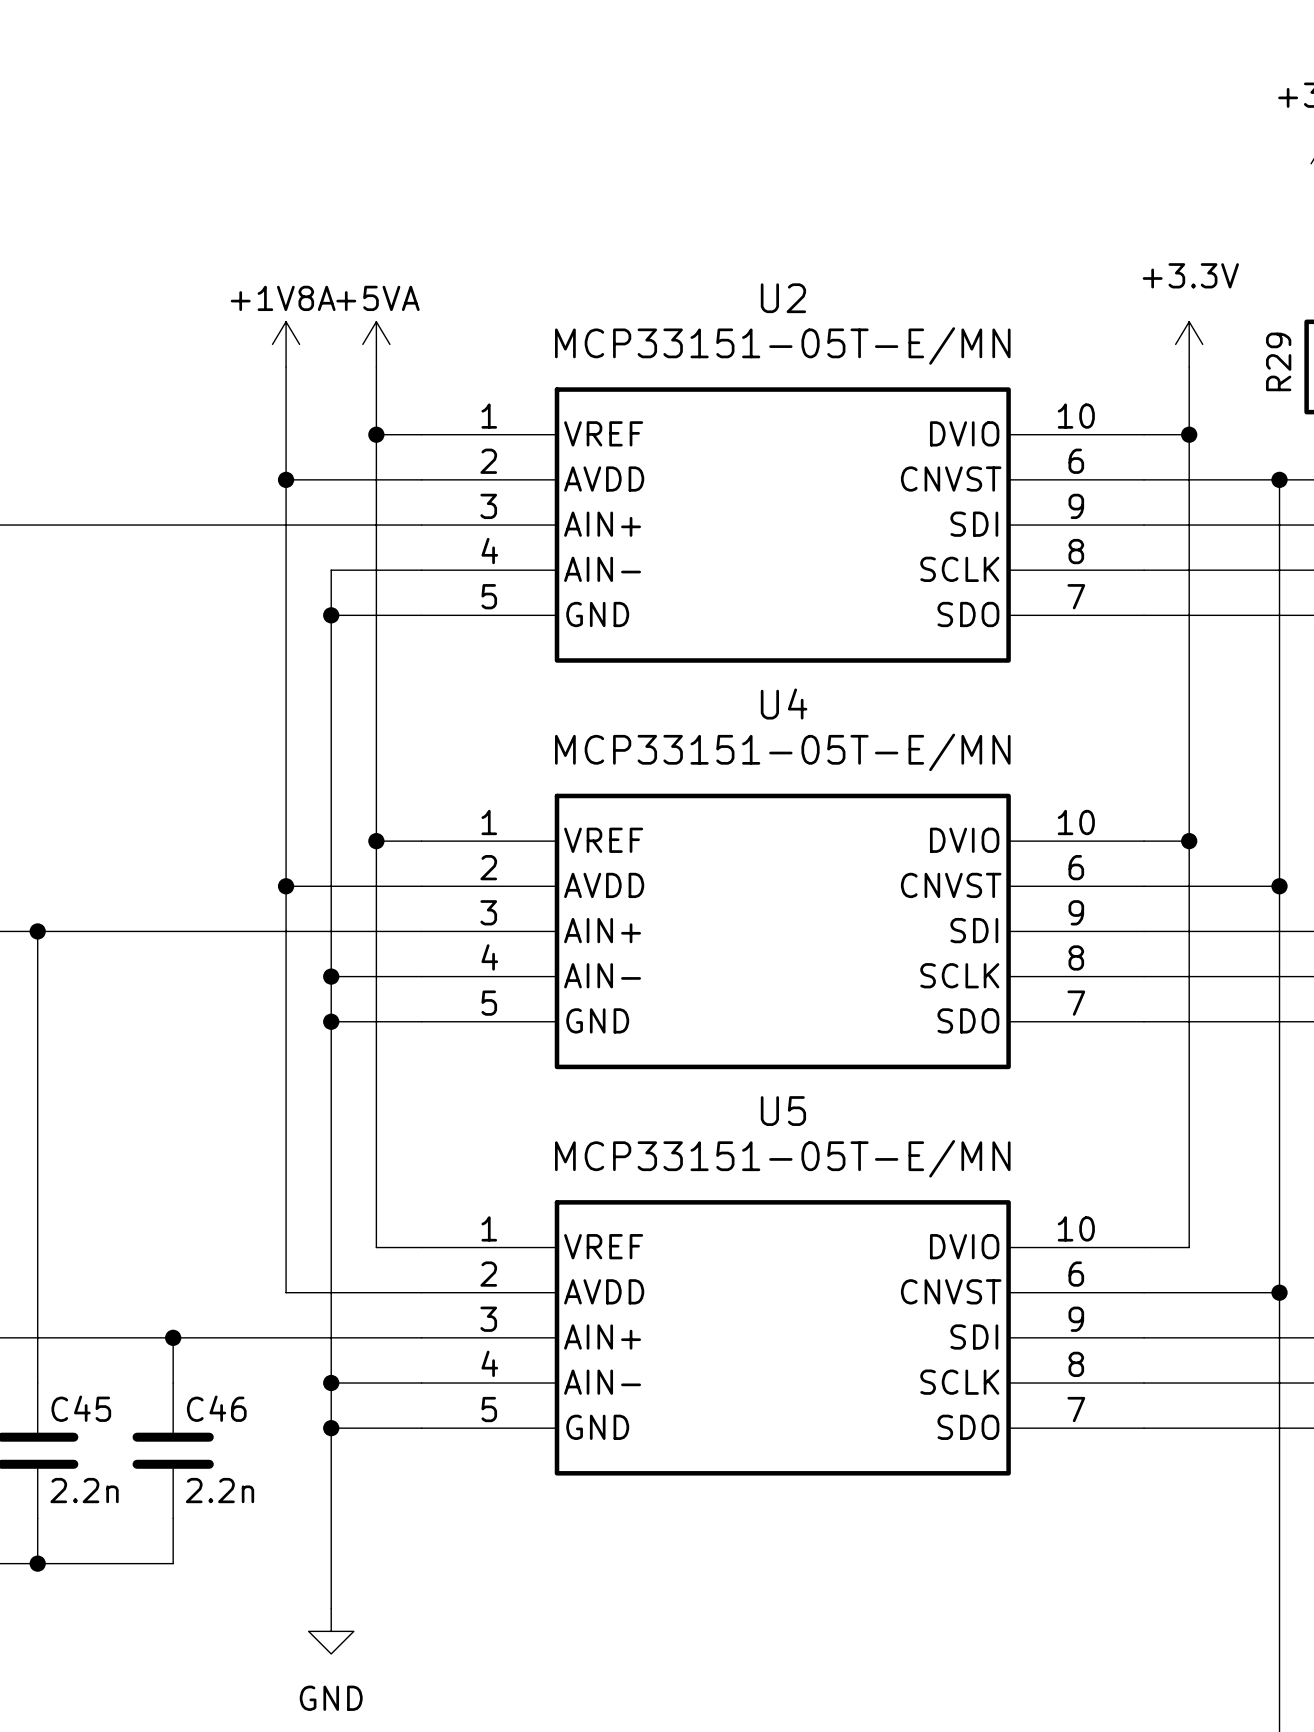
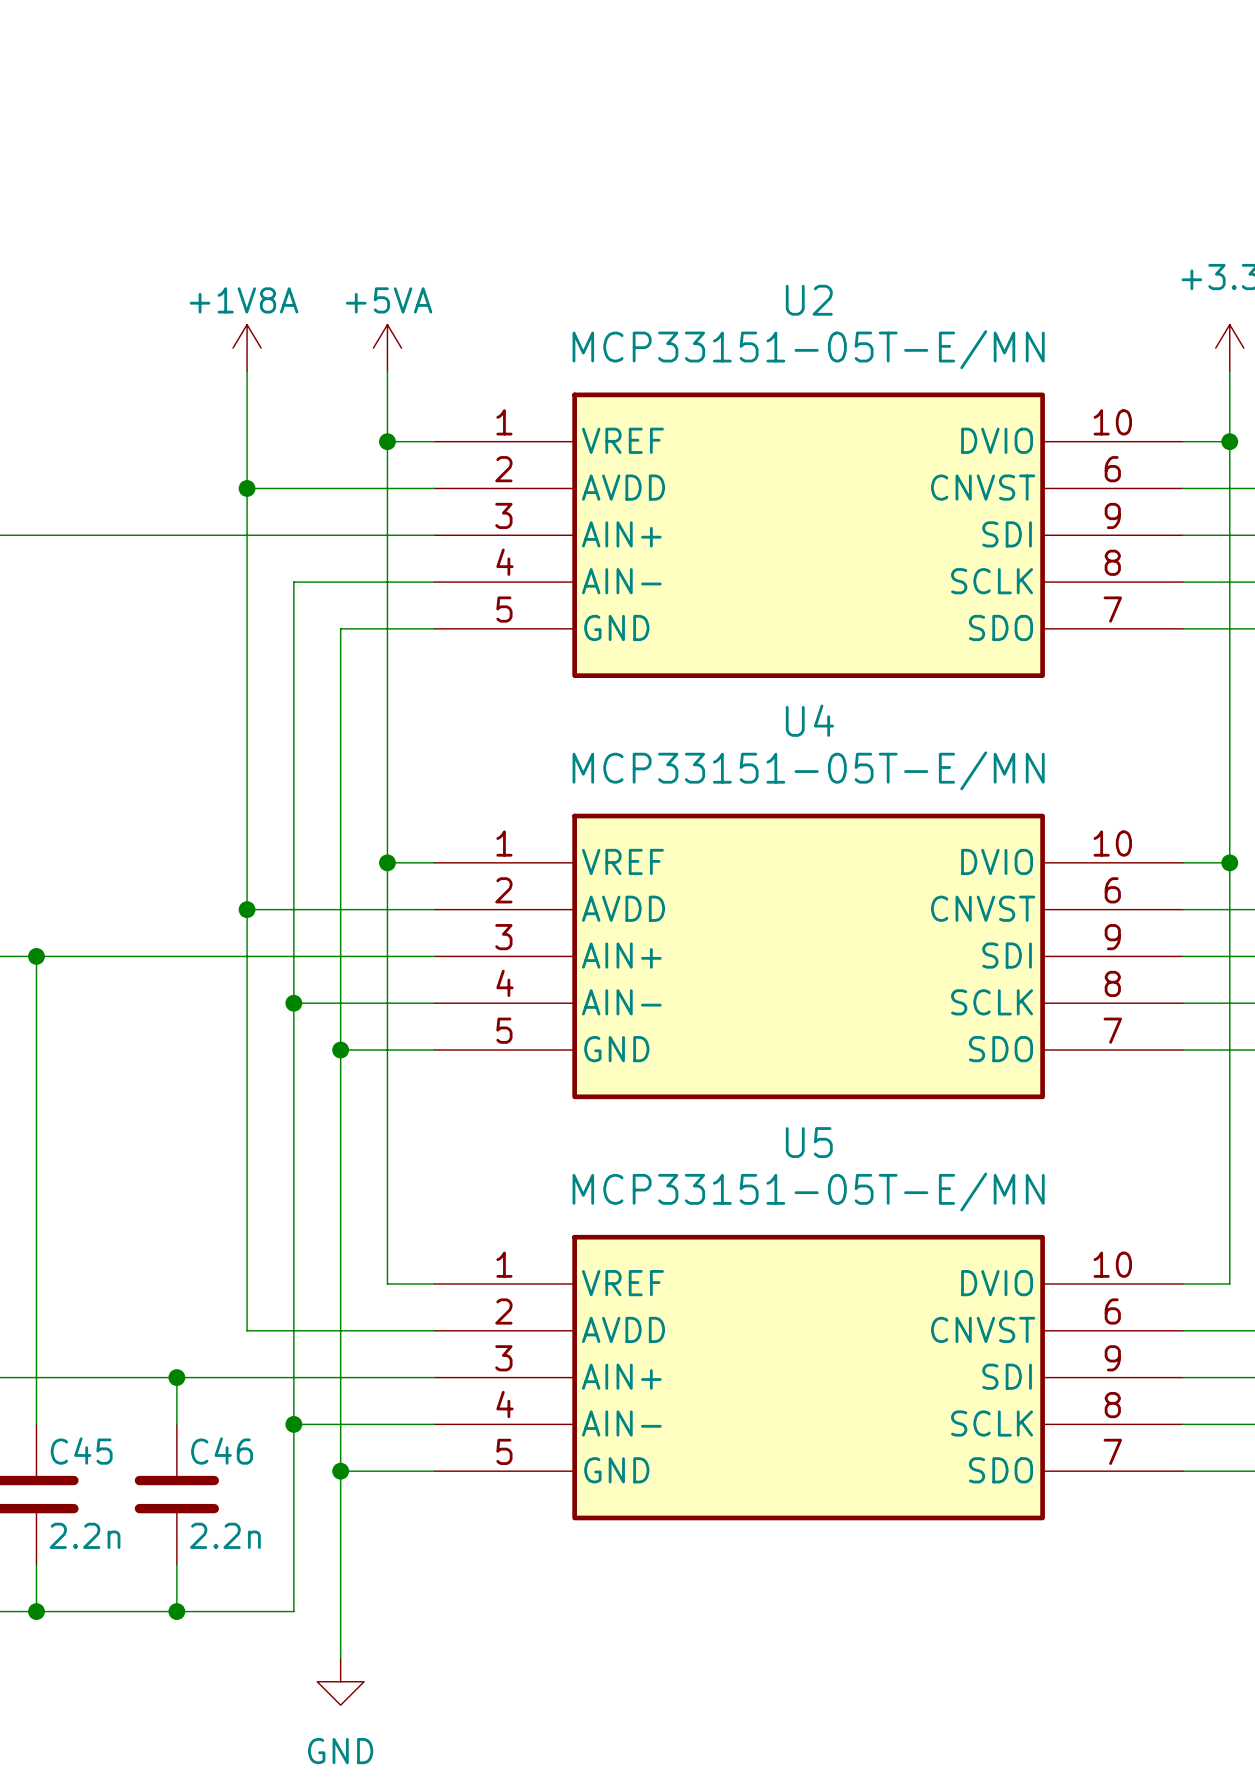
power symbol position: +1V8A (286, 344) -> +1V8A (247, 348)
wire: none -> (247, 371) (247, 1330) (293, 1330) (293, 1611) (176, 1611)
wire: (286, 366) (286, 570) -> none
wire: none -> (247, 488) (293, 488)
junction position: (286, 479) -> (247, 488)
wire: (331, 570) (331, 615) -> (340, 582) (293, 582)
junction: (331, 615) -> none
wire: none -> (247, 909) (293, 909)
junction: none -> (247, 909)
junction: (286, 886) -> none
wire: none -> (293, 1003) (340, 1003)
junction: none -> (293, 1003)
junction: (331, 976) -> none
wire: none -> (293, 1424) (340, 1424)
junction position: (331, 1383) -> (293, 1424)
junction: none -> (176, 1611)

